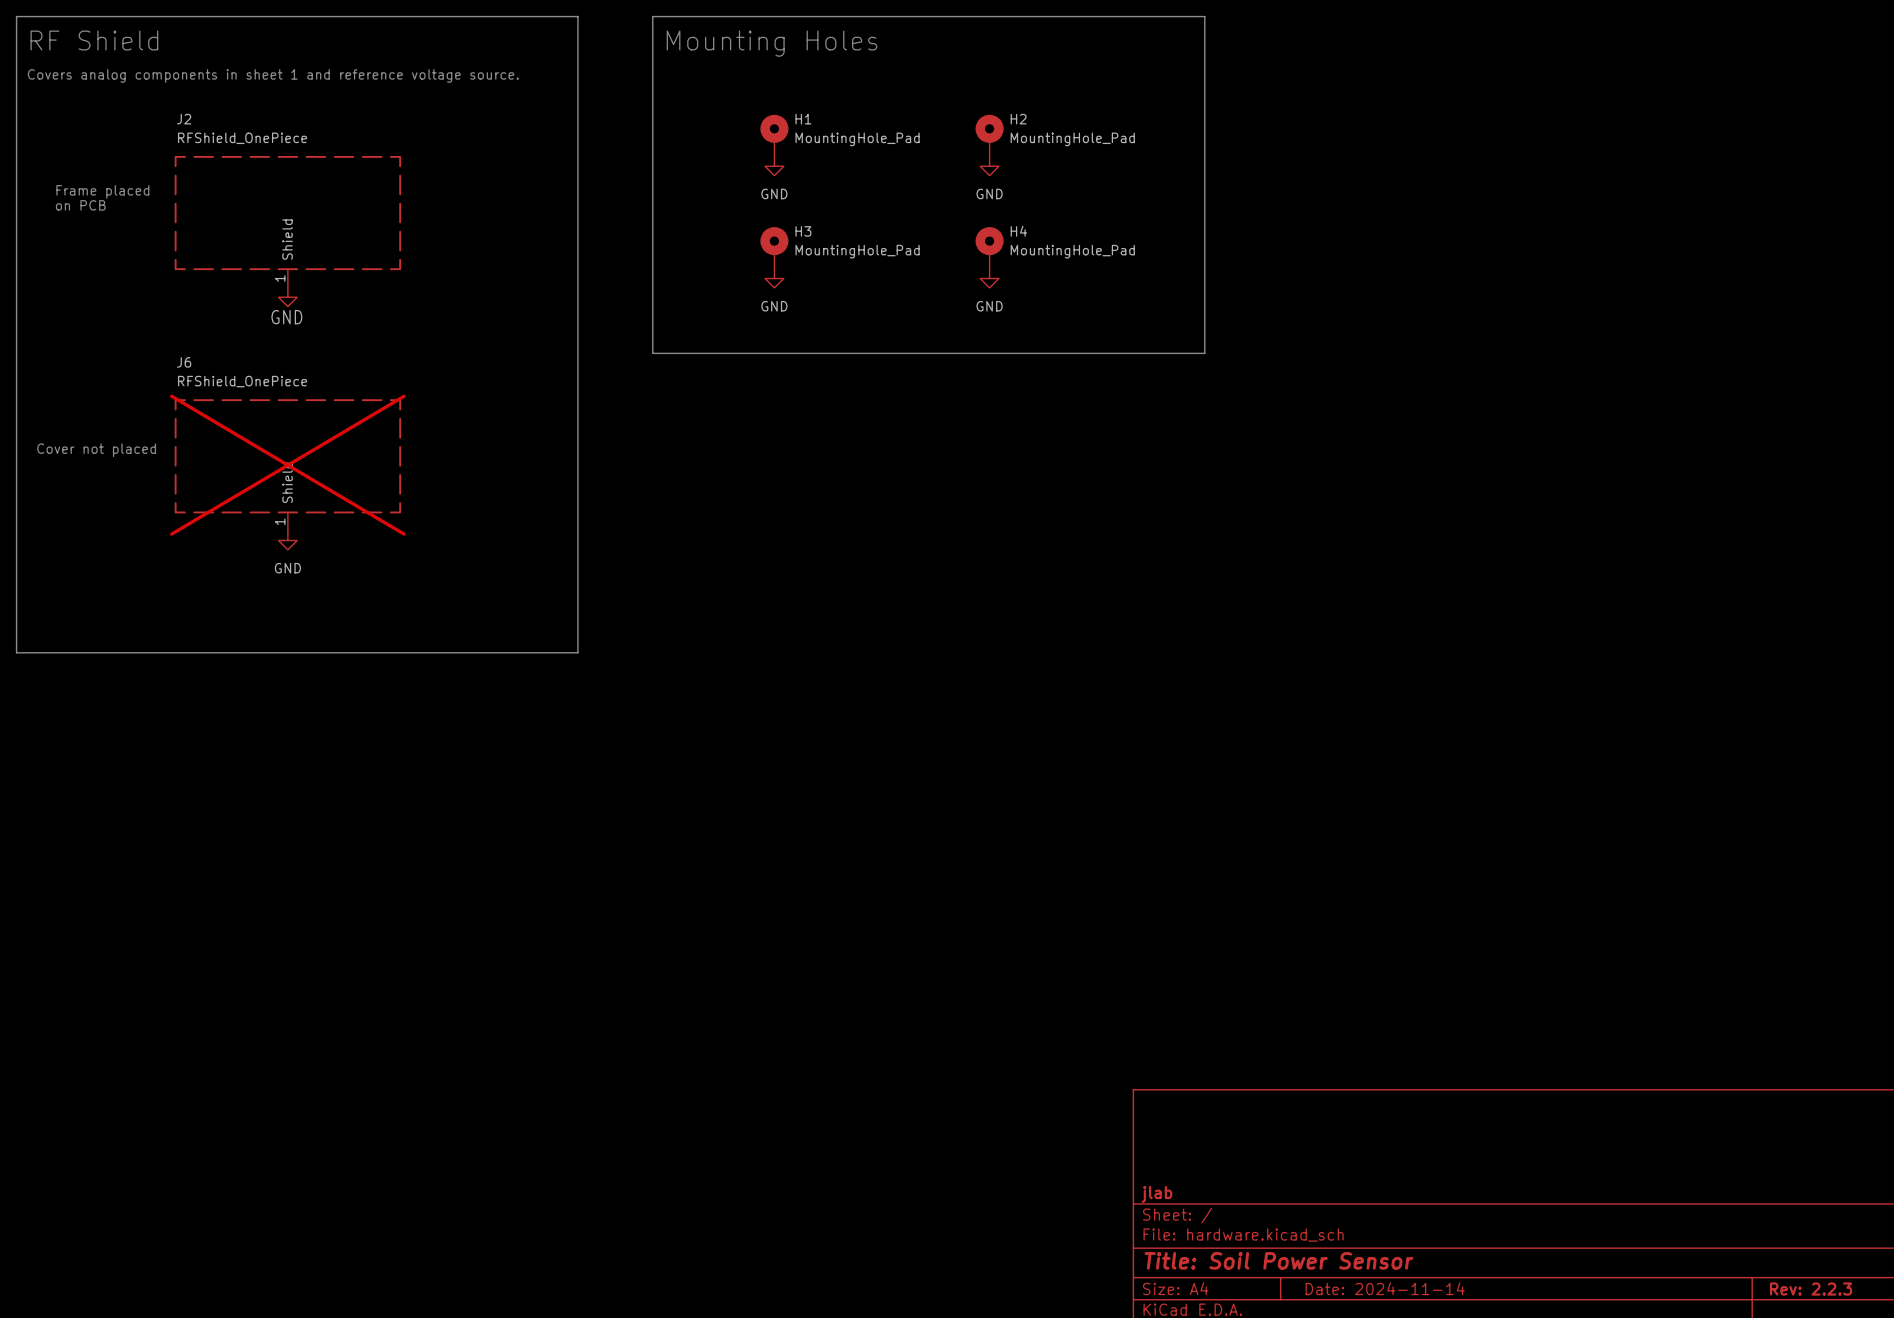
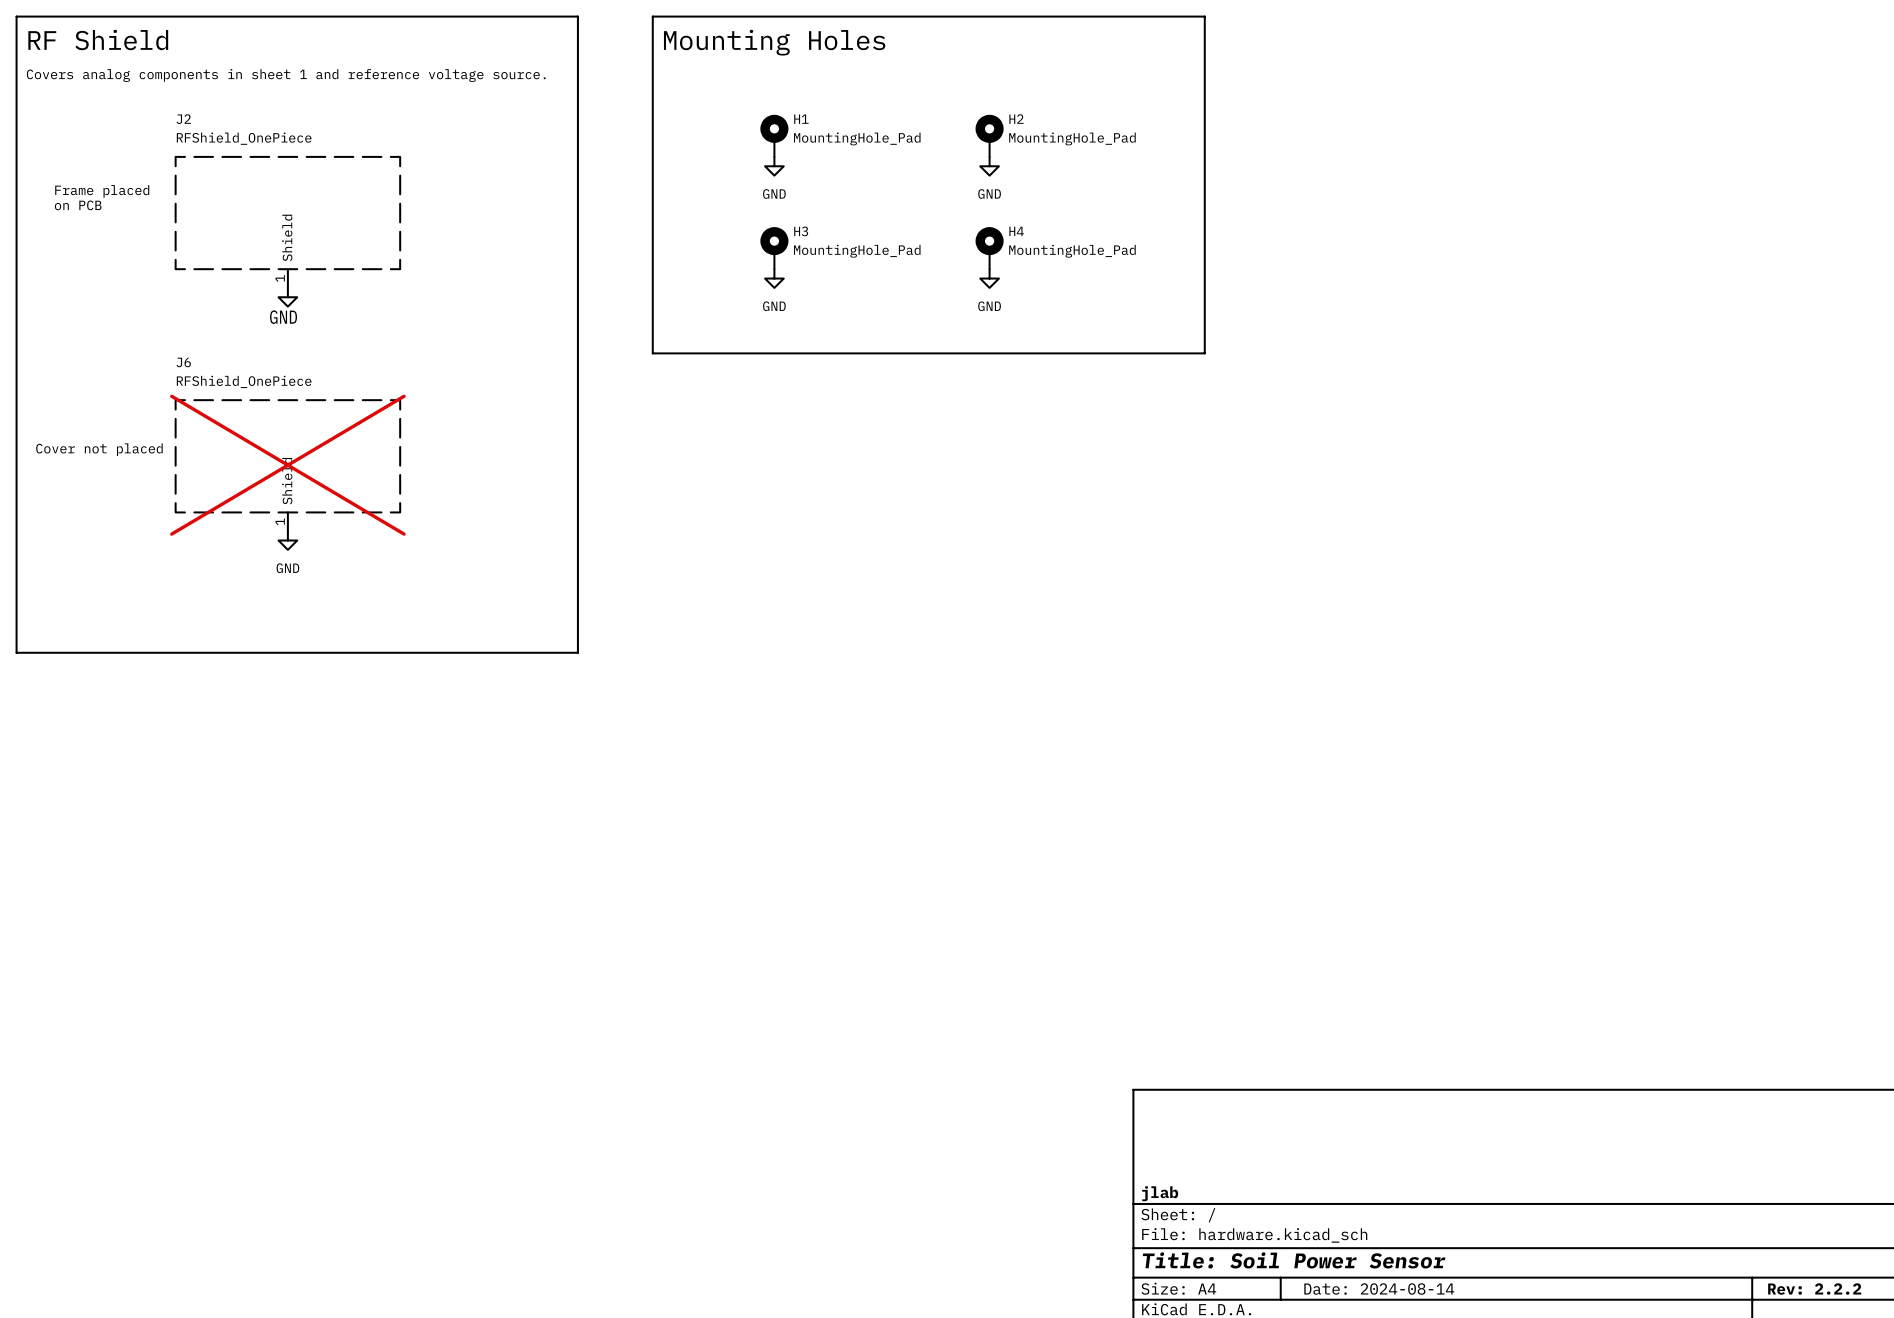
title block: Date: 2024-11-14 (1385, 1288) -> Date: 2024-08-14 (1379, 1289)
title block: Rev: 2.2.3 (1811, 1289) -> Rev: 2.2.2 (1814, 1289)

